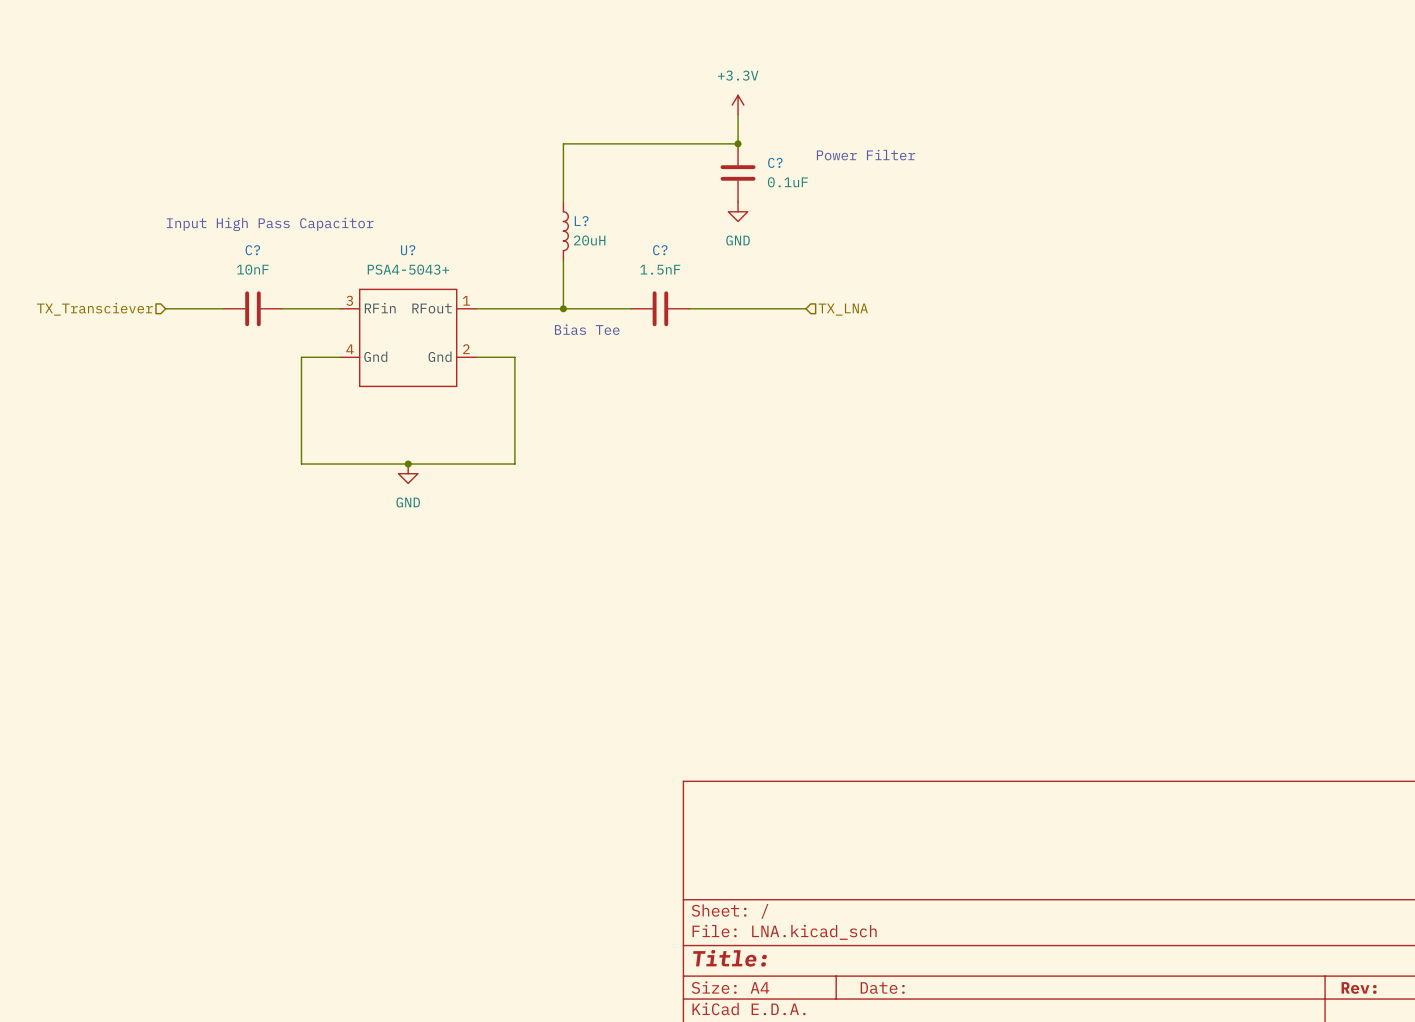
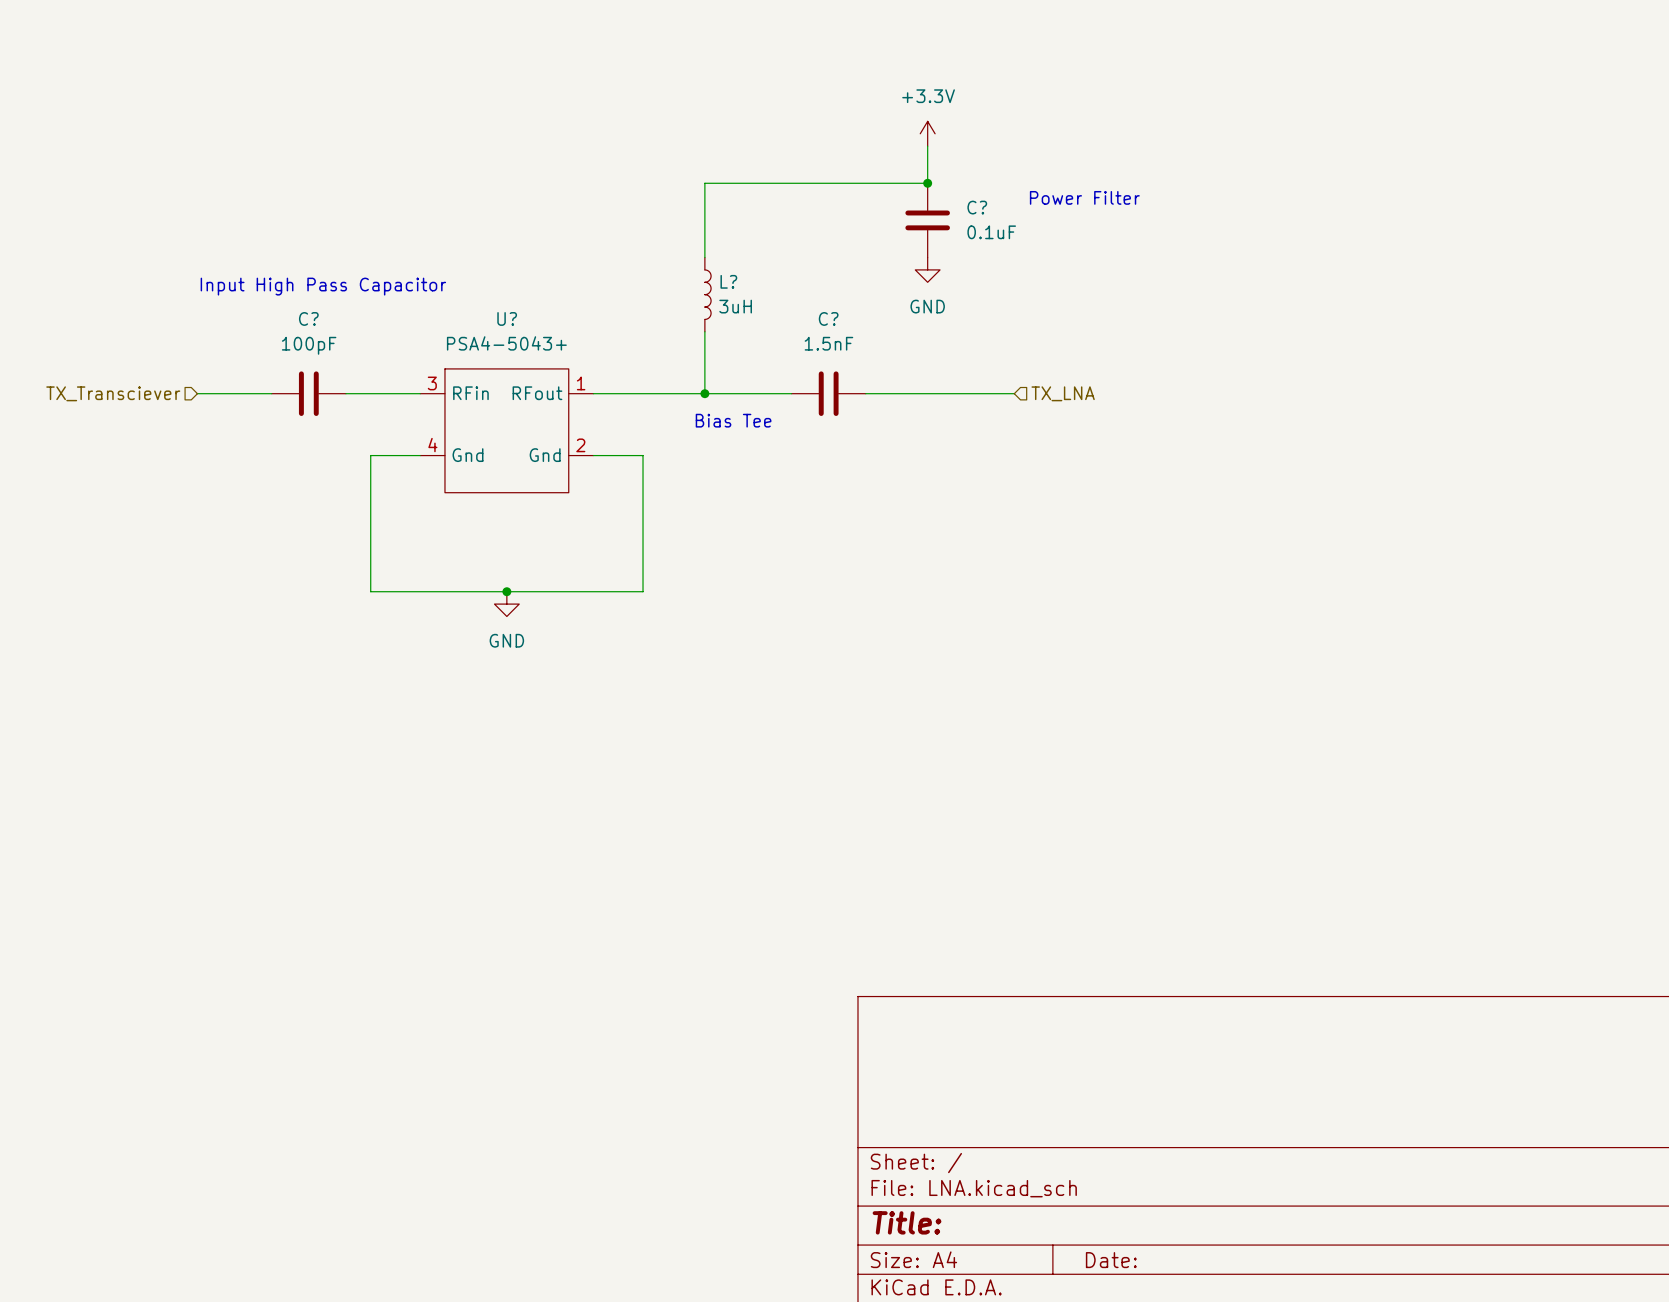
L? value: 20uH (589, 240) -> 3uH (735, 306)
C? value: 10nF (252, 269) -> 100pF (309, 345)

